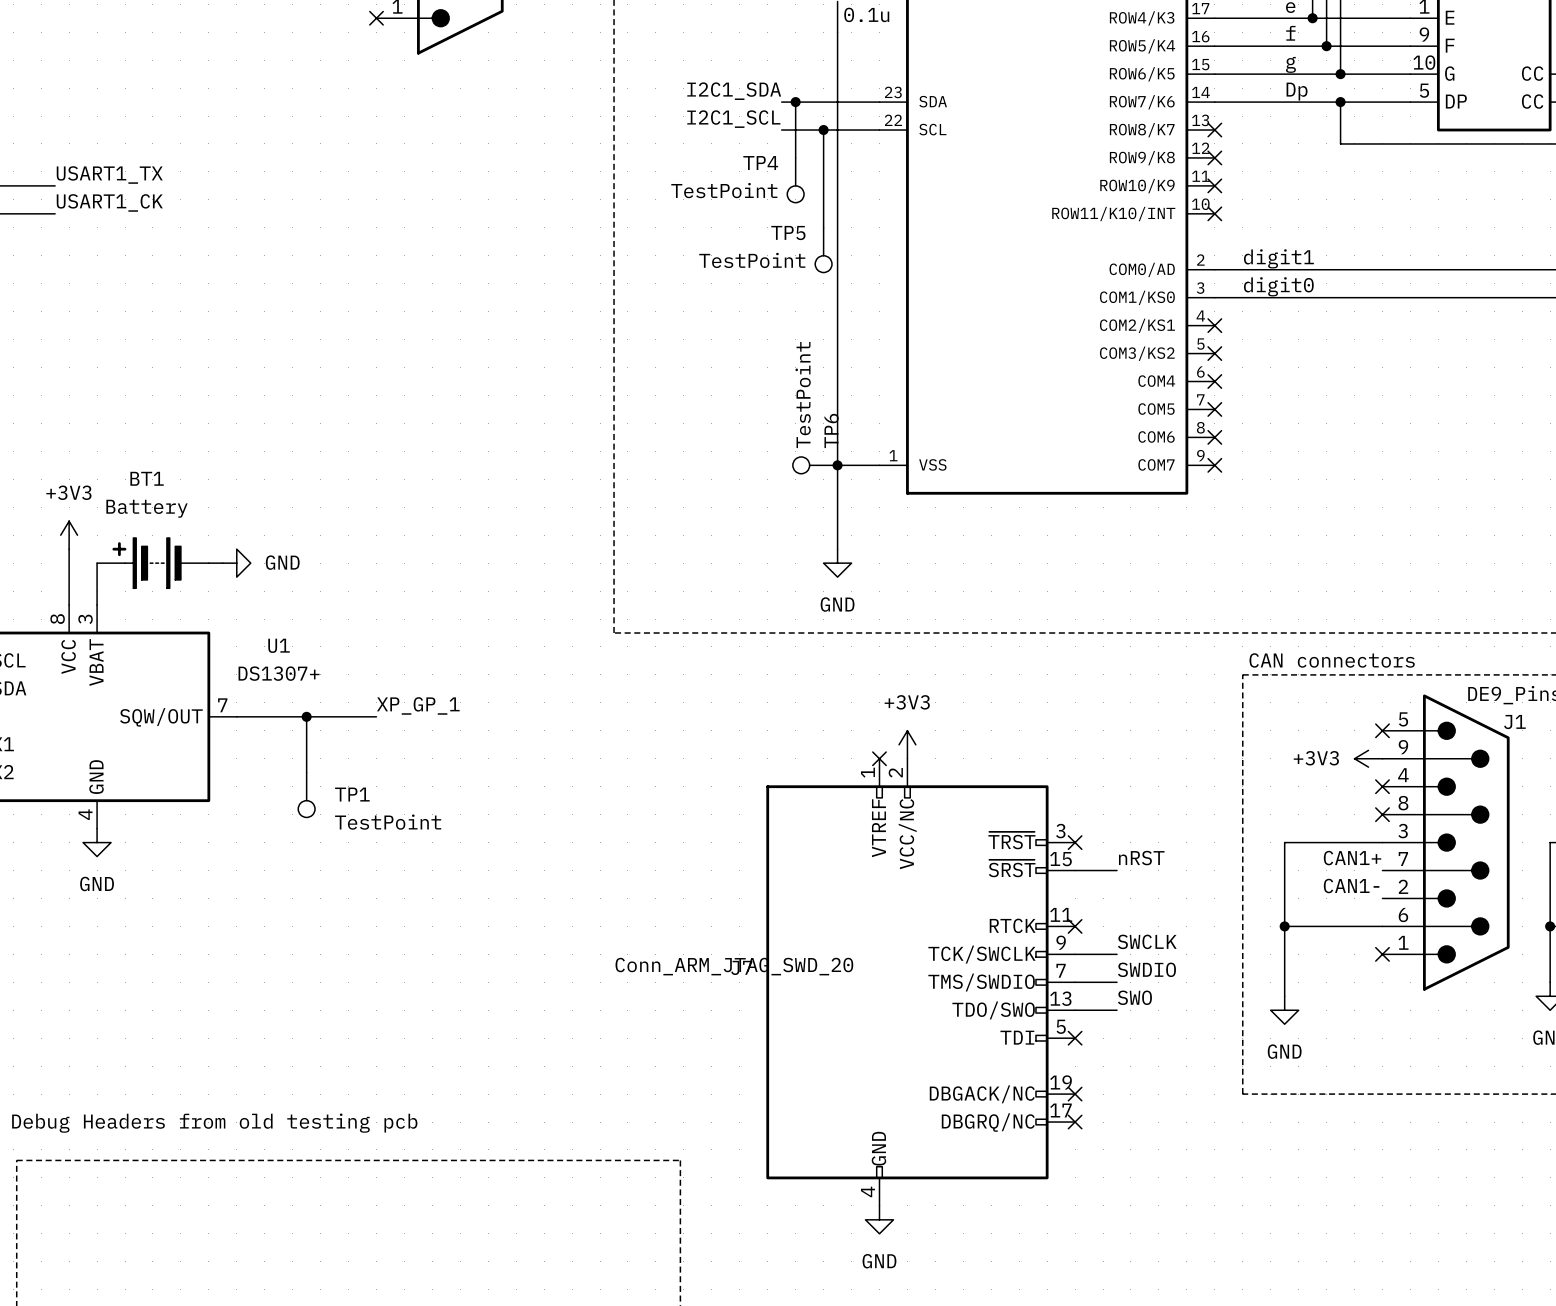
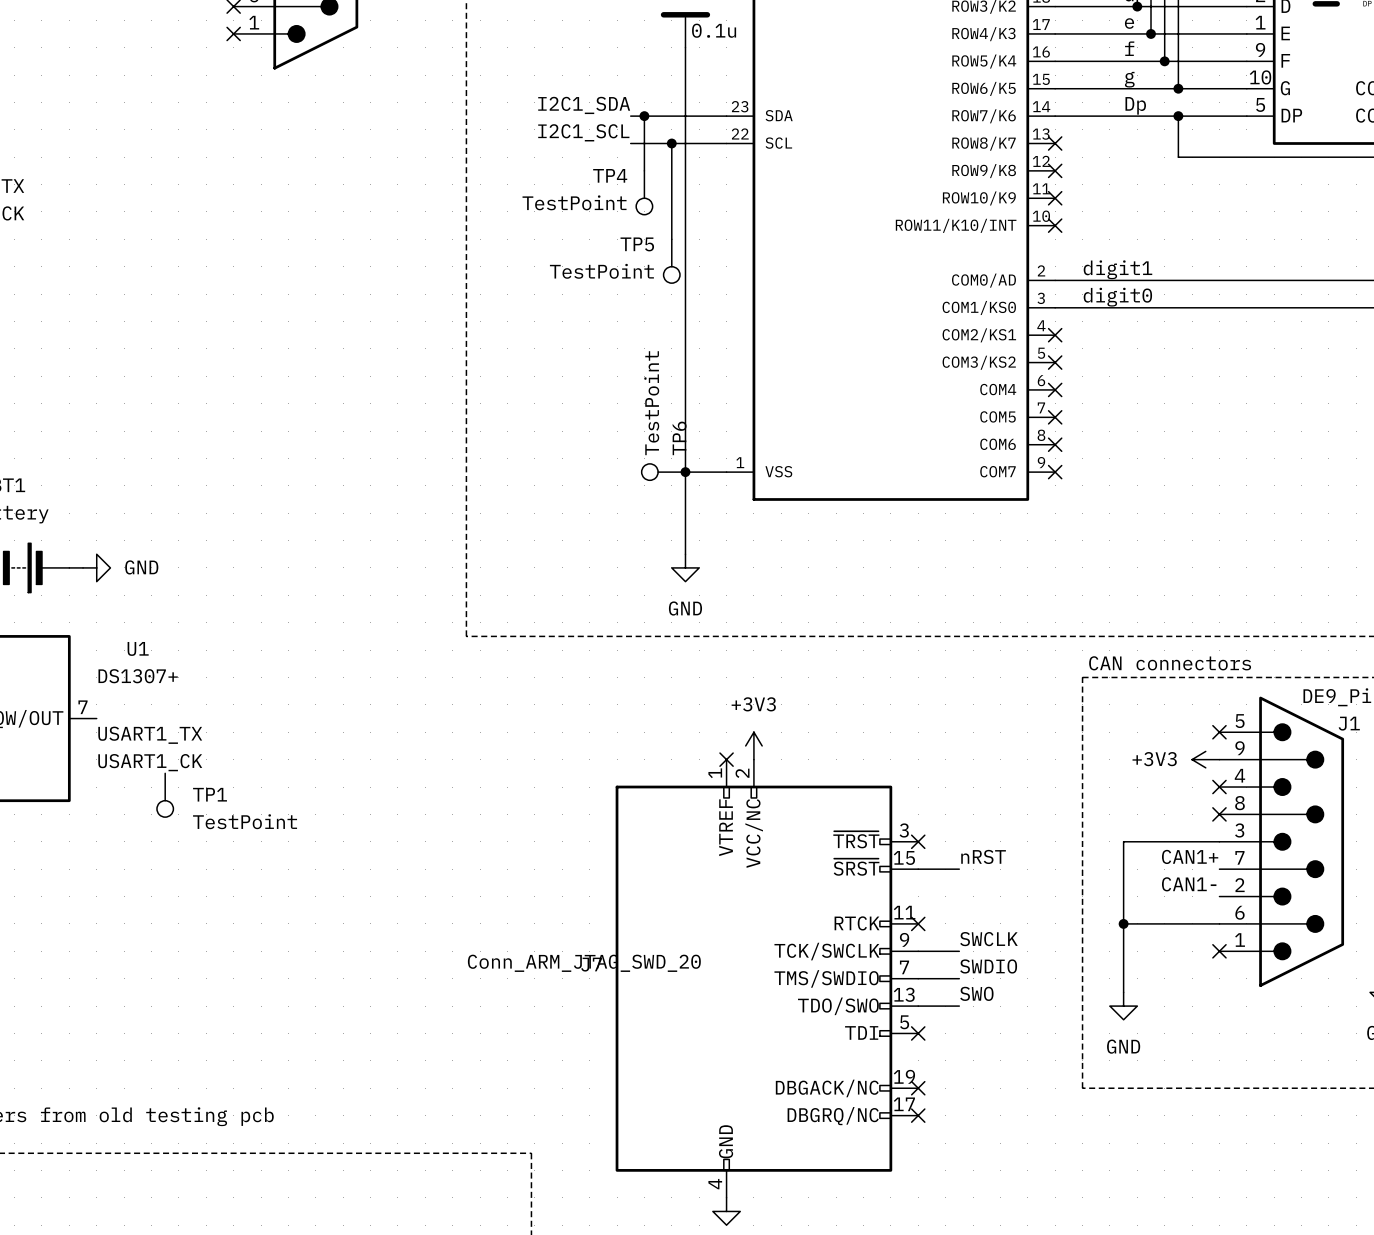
label: XP_GP_1 (418, 705) -> none
wire: (236, 716) (376, 716) -> none
wire: (306, 716) (306, 772) -> none
junction: (306, 716) -> none
label: none -> USART1_TX (150, 735)
label: none -> USART1_CK (150, 762)

